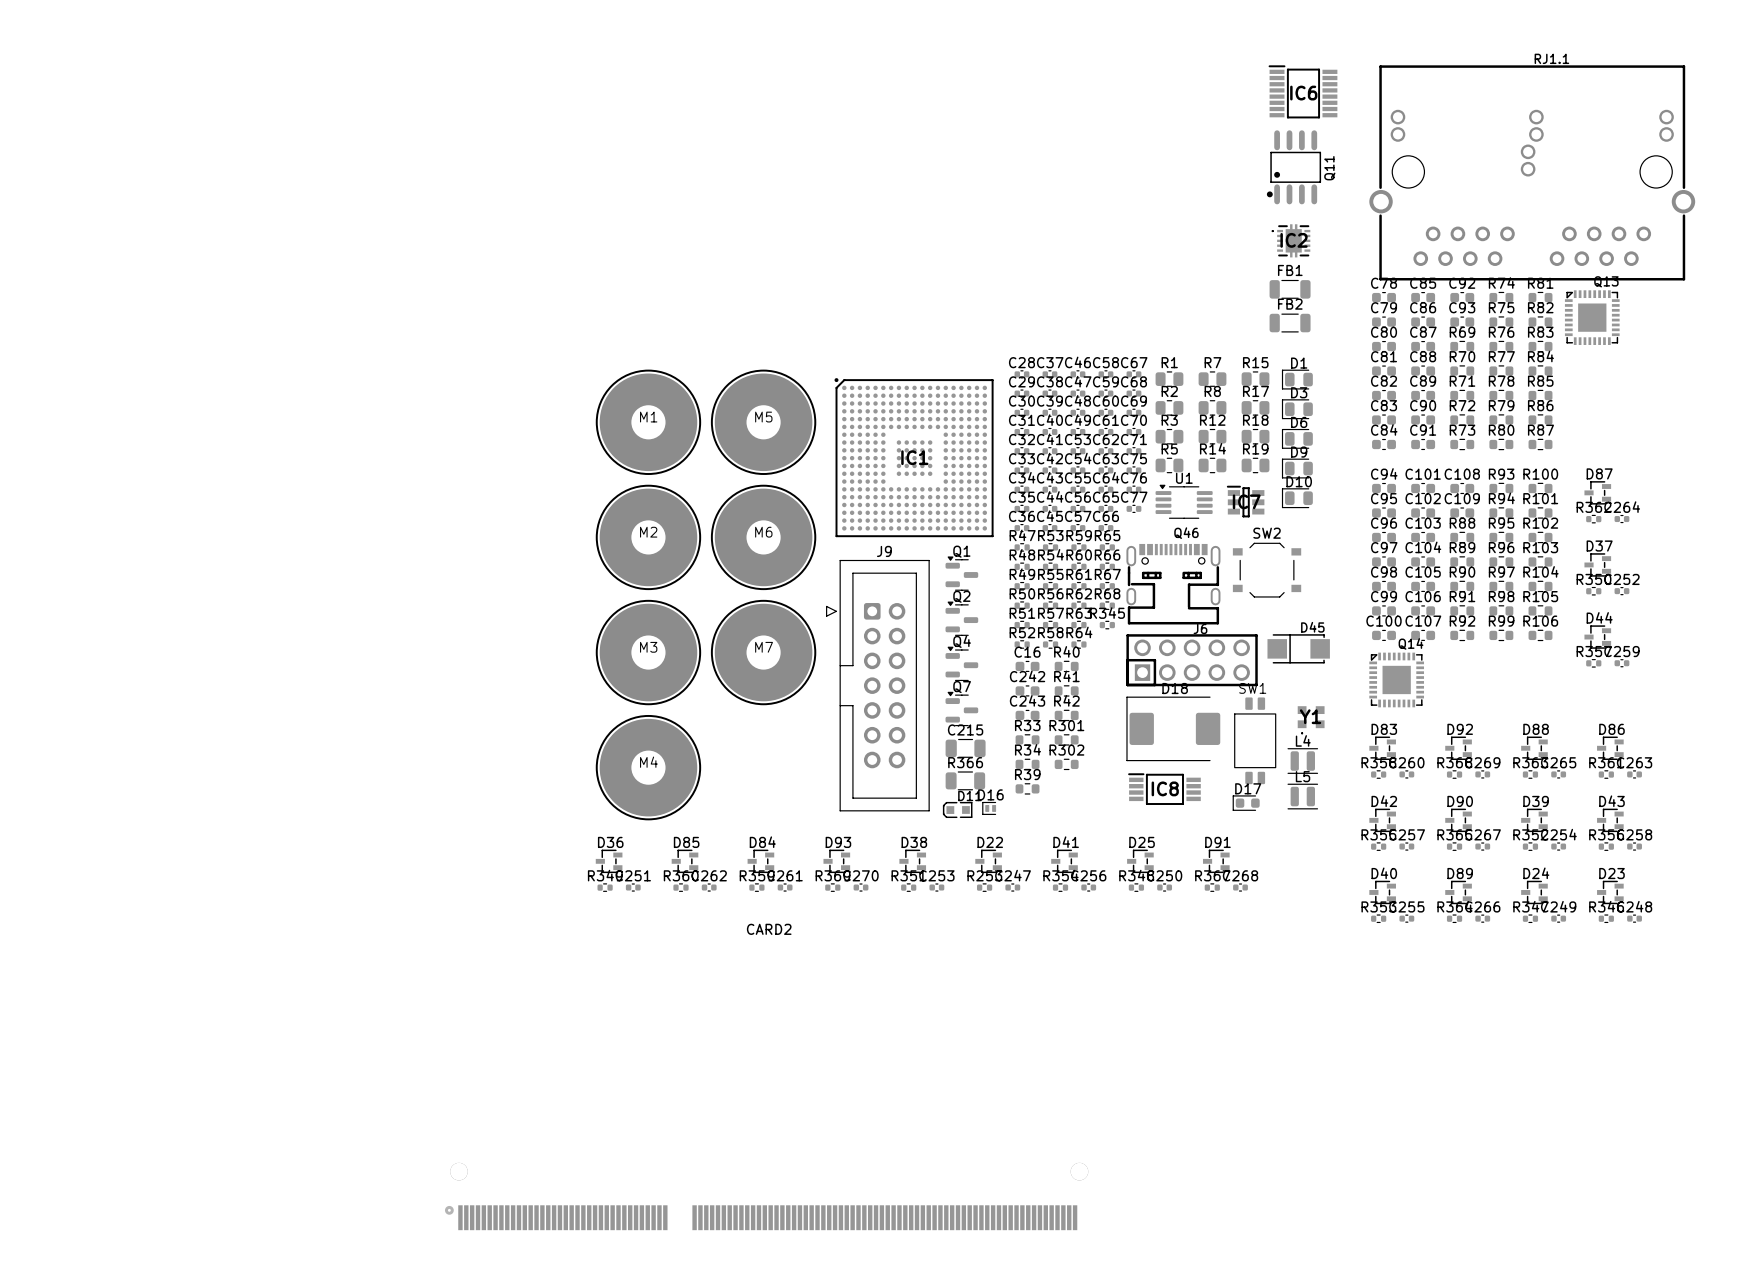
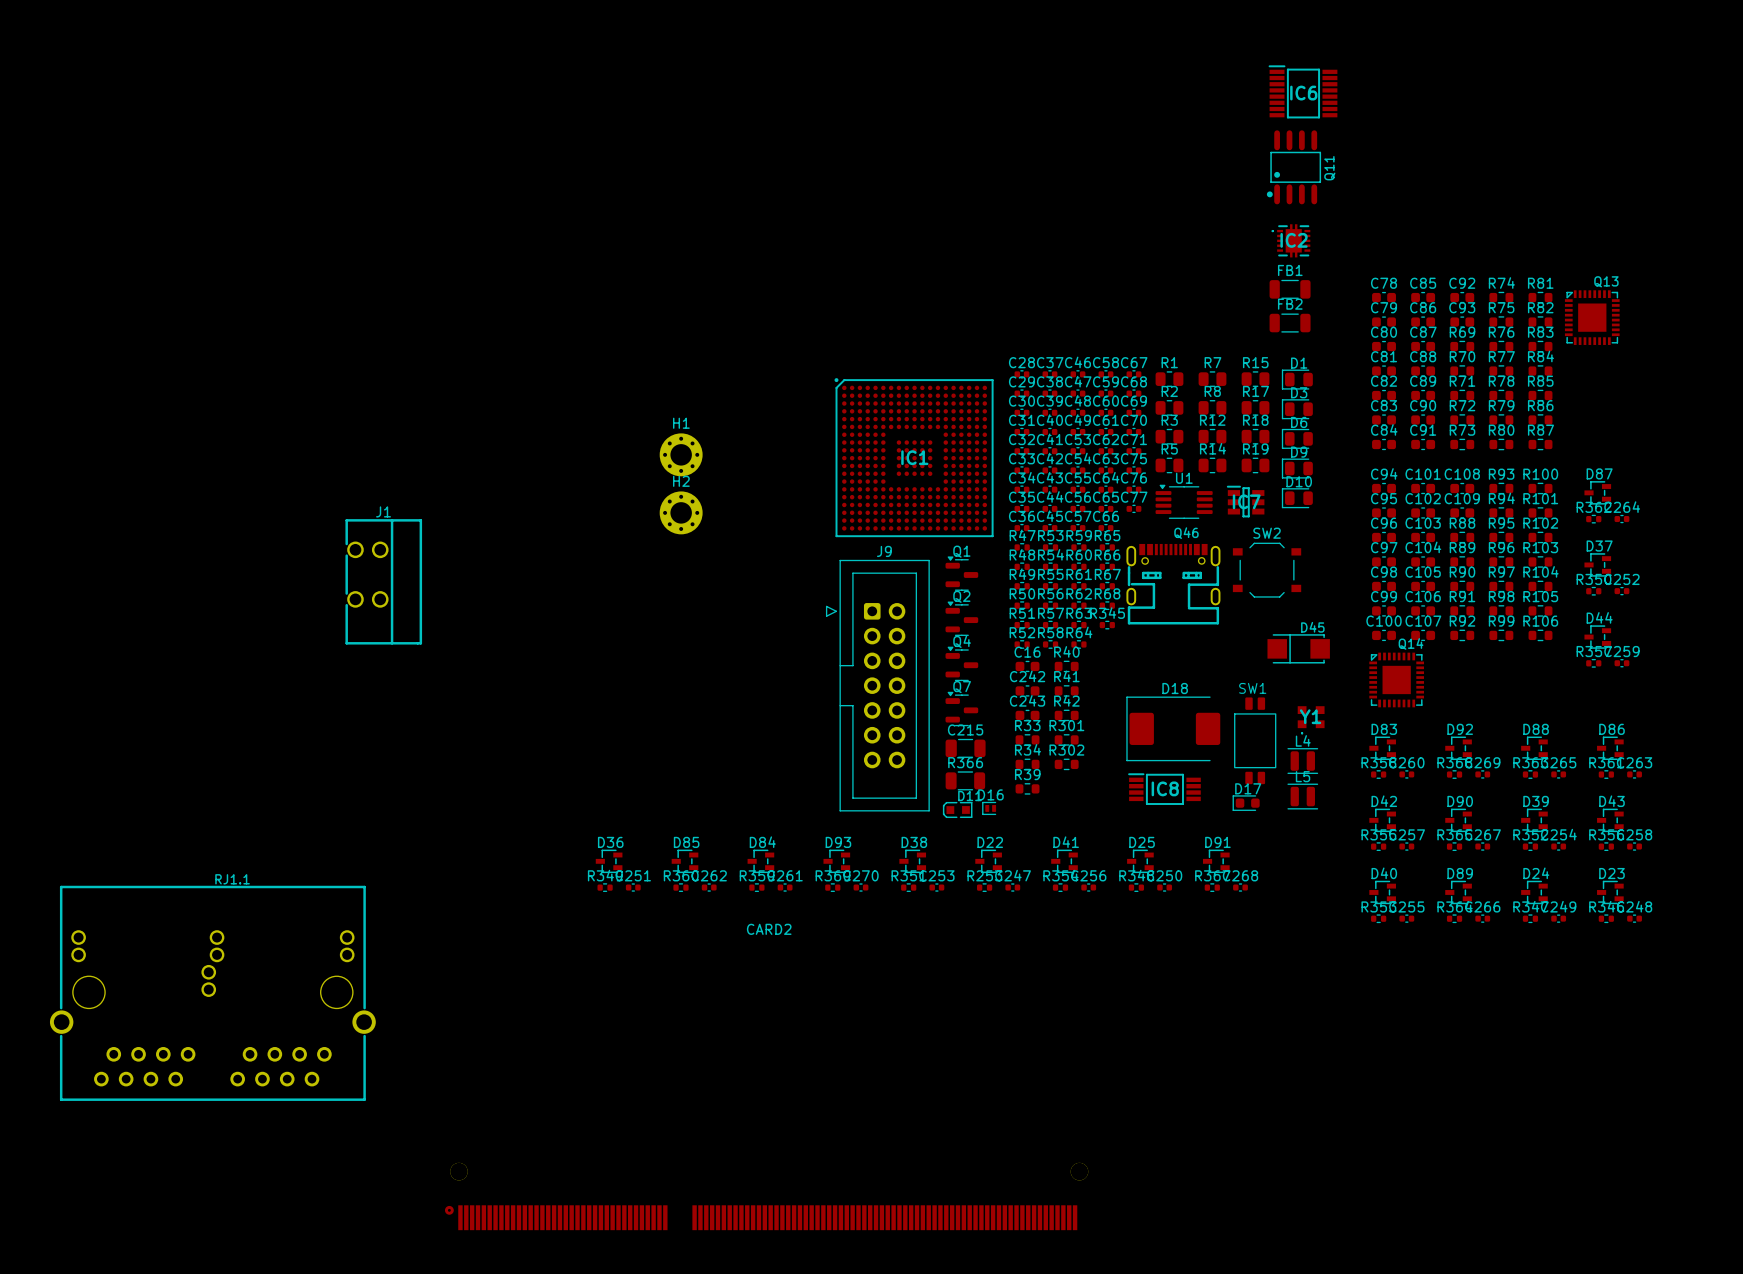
RJ1.1 position: (1532, 172) -> (212, 993)
M1: (648, 422) -> none
M5: (763, 422) -> none
H1: none -> (681, 454)
H2: none -> (681, 512)
M2: (648, 537) -> none
M6: (763, 537) -> none
J1: none -> (383, 581)
M3: (648, 652) -> none
M7: (763, 652) -> none
J6: (1192, 660) -> none
M4: (648, 767) -> none

